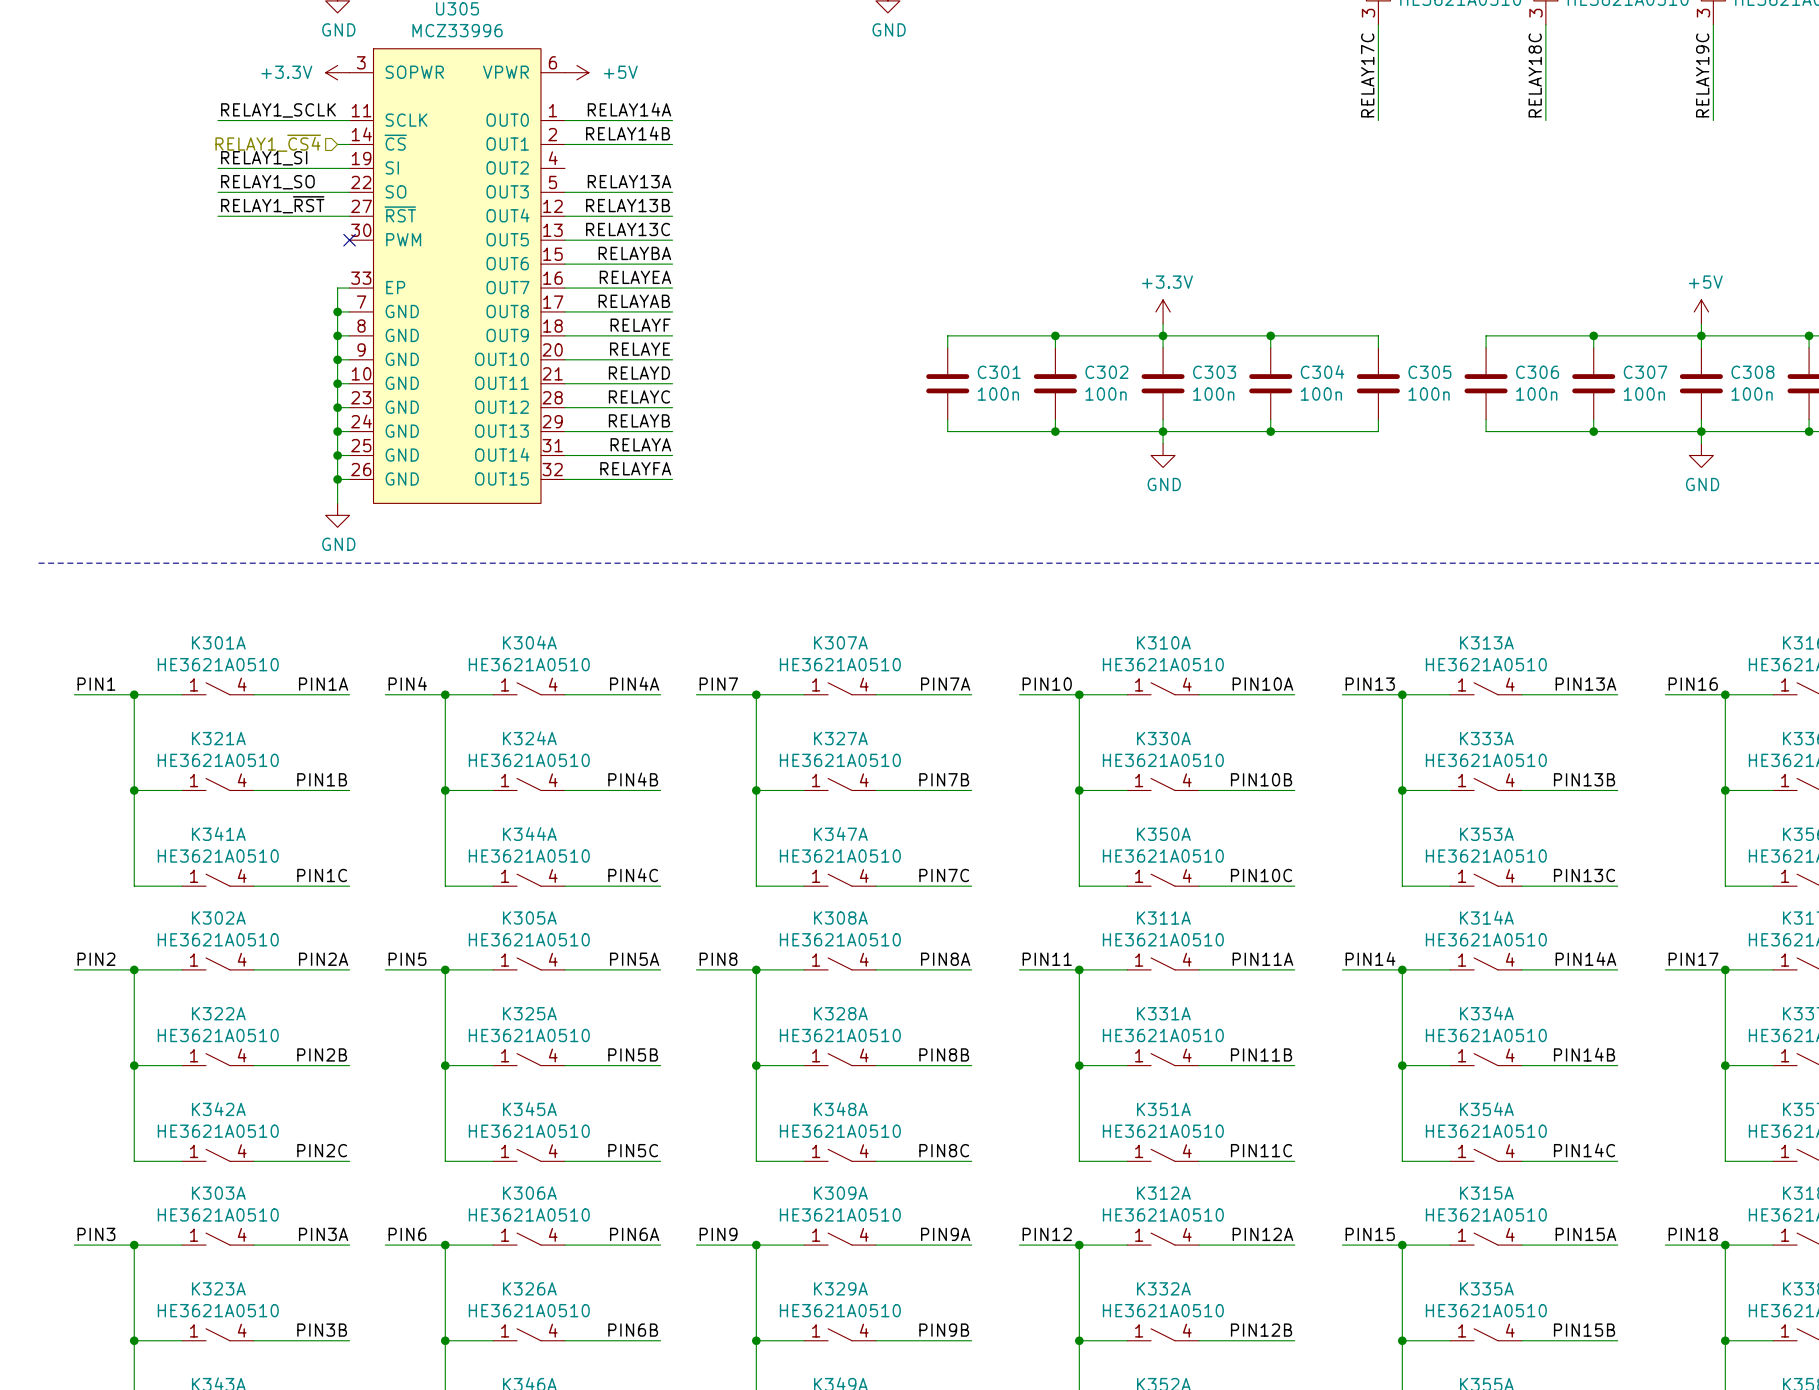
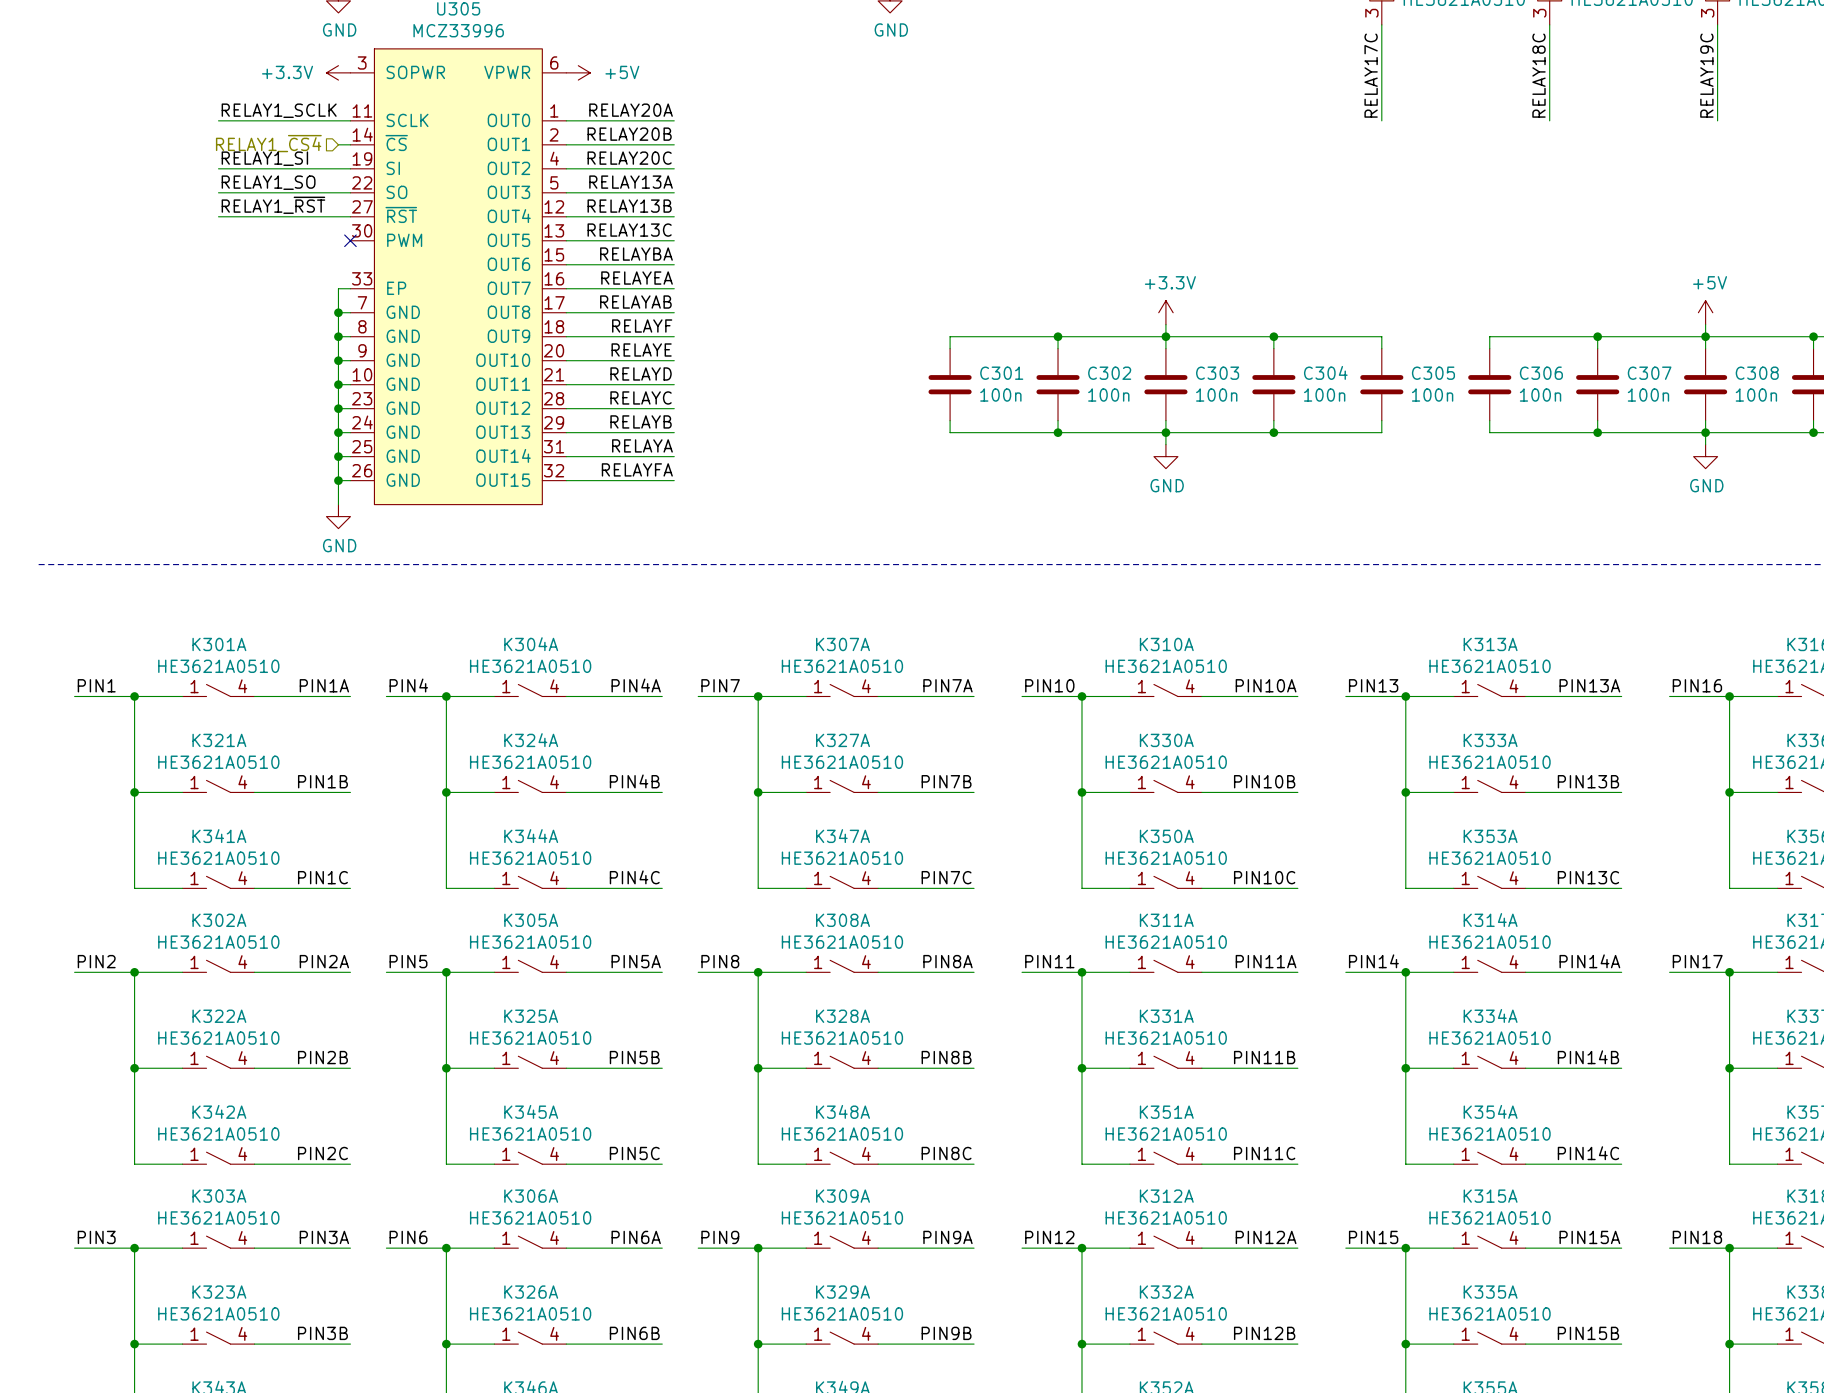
label: RELAY14A (629, 109) -> RELAY20A (631, 110)
label: RELAY14B (628, 133) -> RELAY20B (629, 134)
label: none -> RELAY20C (629, 158)
wire: none -> (566, 168) (674, 168)

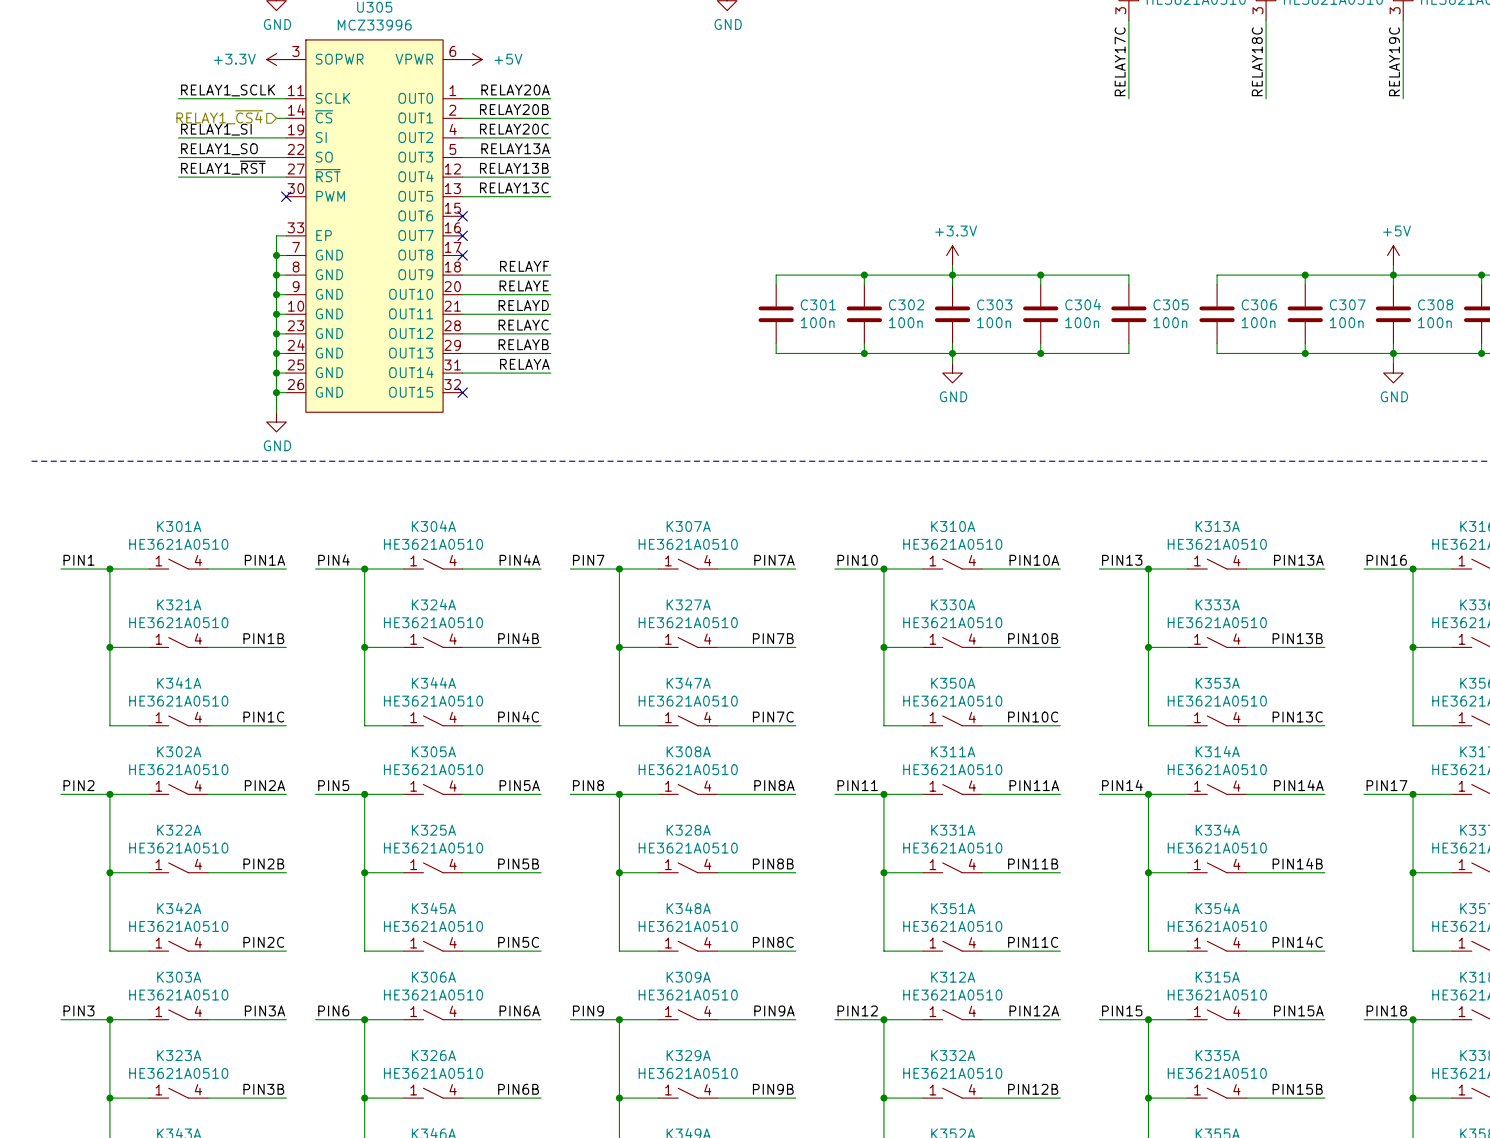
label: RELAYBA (636, 254) -> none
wire: (566, 264) (674, 264) -> none
no-connect mark: none -> (462, 216)
label: RELAYEA (637, 278) -> none
wire: (566, 288) (674, 288) -> none
no-connect mark: none -> (462, 235)
label: RELAYAB (635, 302) -> none
wire: (566, 312) (674, 312) -> none
no-connect mark: none -> (462, 255)
label: RELAYFA (637, 469) -> none
wire: (566, 480) (674, 480) -> none
no-connect mark: none -> (462, 392)

